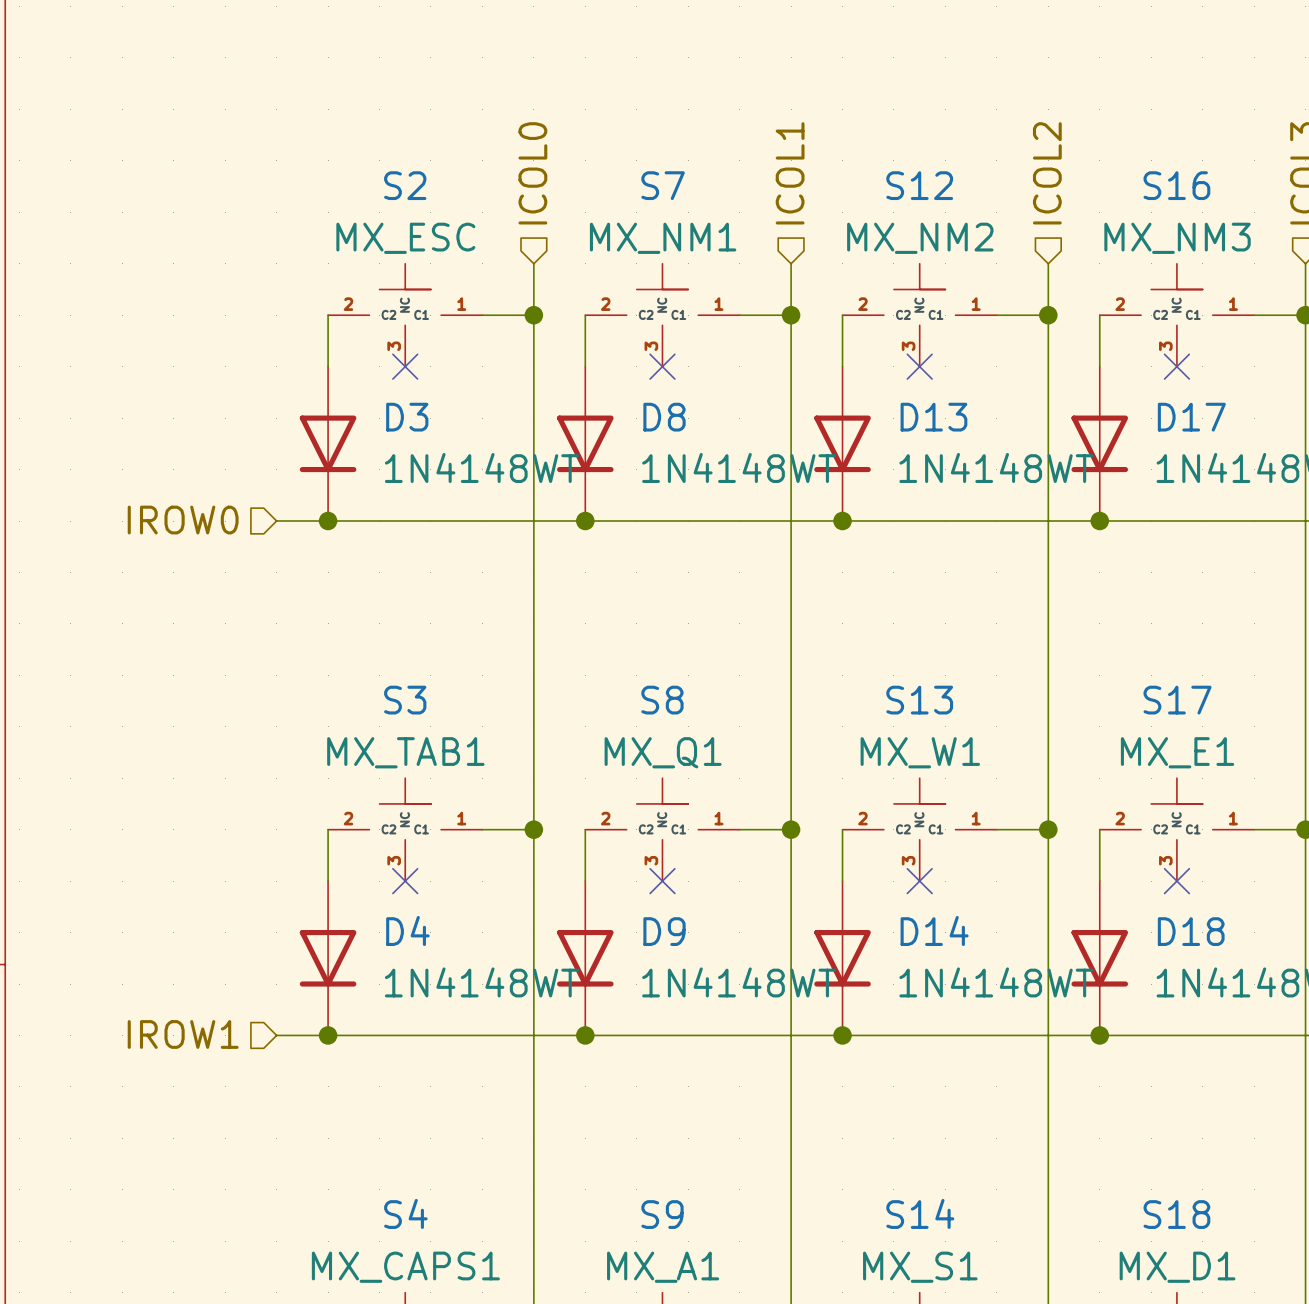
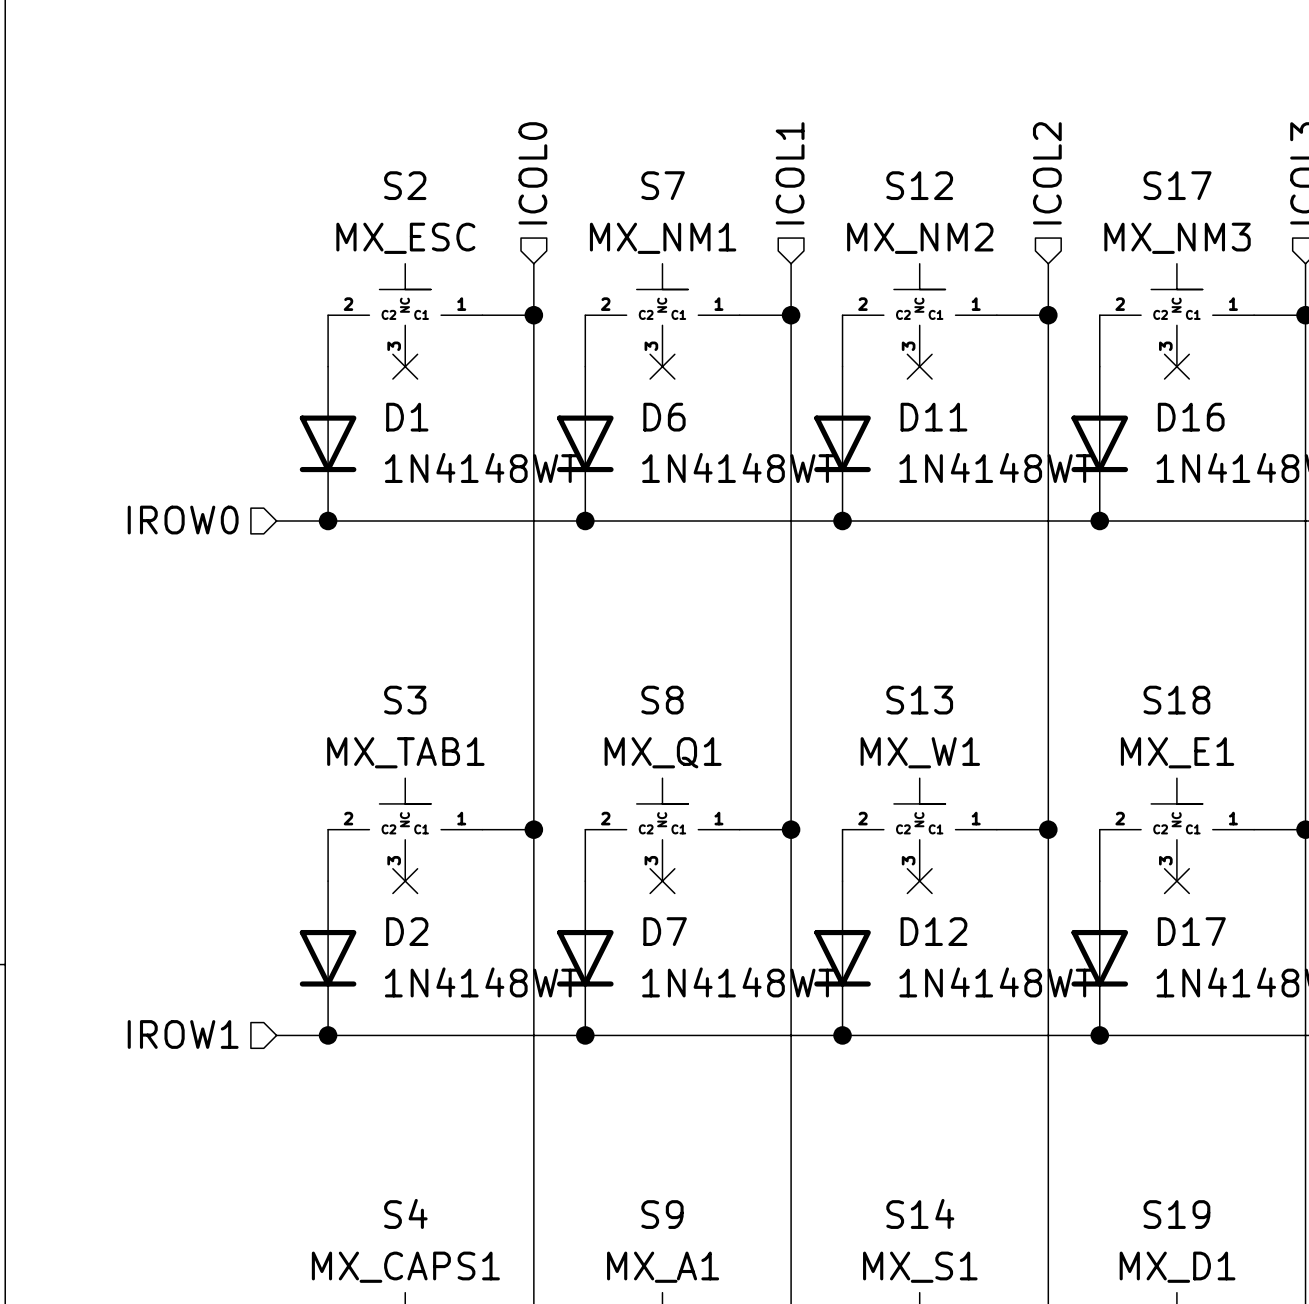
S16 name: S16 (1176, 185) -> S17 (1177, 185)
D3 name: D3 (407, 417) -> D1 (407, 417)
D8 name: D8 (664, 417) -> D6 (664, 417)
D13 name: D13 (933, 417) -> D11 (933, 417)
D17 name: D17 (1191, 417) -> D16 (1191, 417)
S17 name: S17 (1177, 700) -> S18 (1176, 700)
D4 name: D4 (407, 930) -> D2 (407, 931)
D14 name: D14 (934, 930) -> D12 (933, 931)
D9 name: D9 (664, 931) -> D7 (665, 931)
D18 name: D18 (1191, 931) -> D17 (1191, 931)
S18 name: S18 (1176, 1214) -> S19 (1176, 1214)

